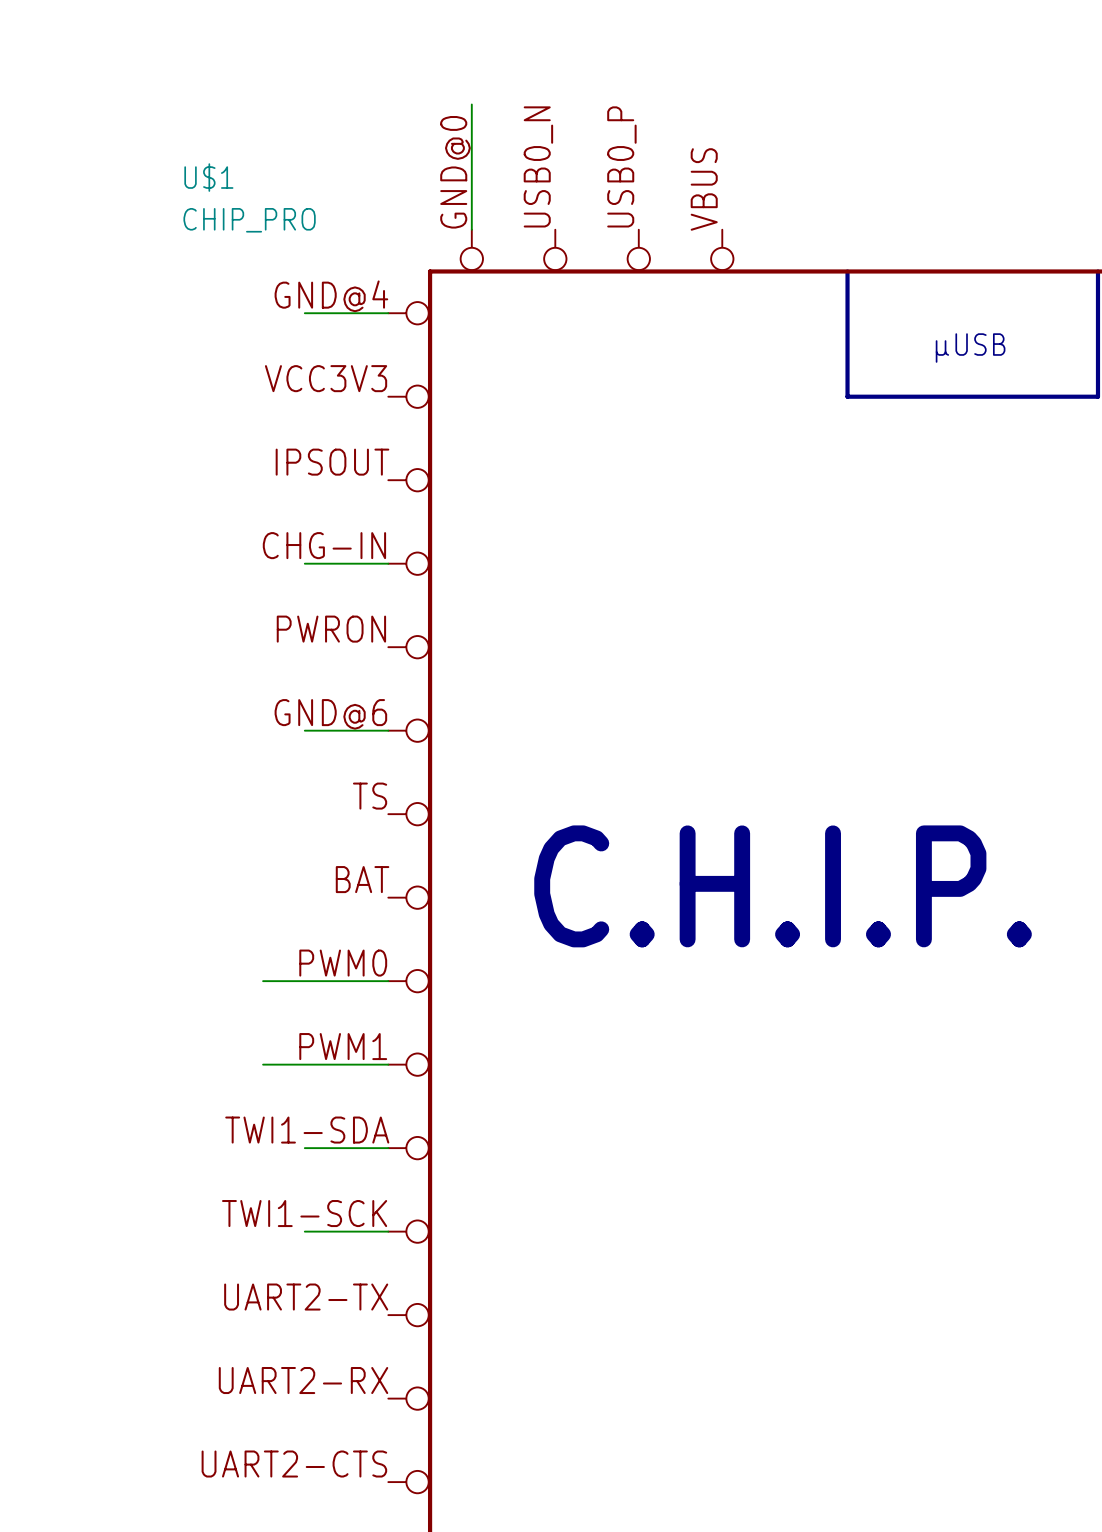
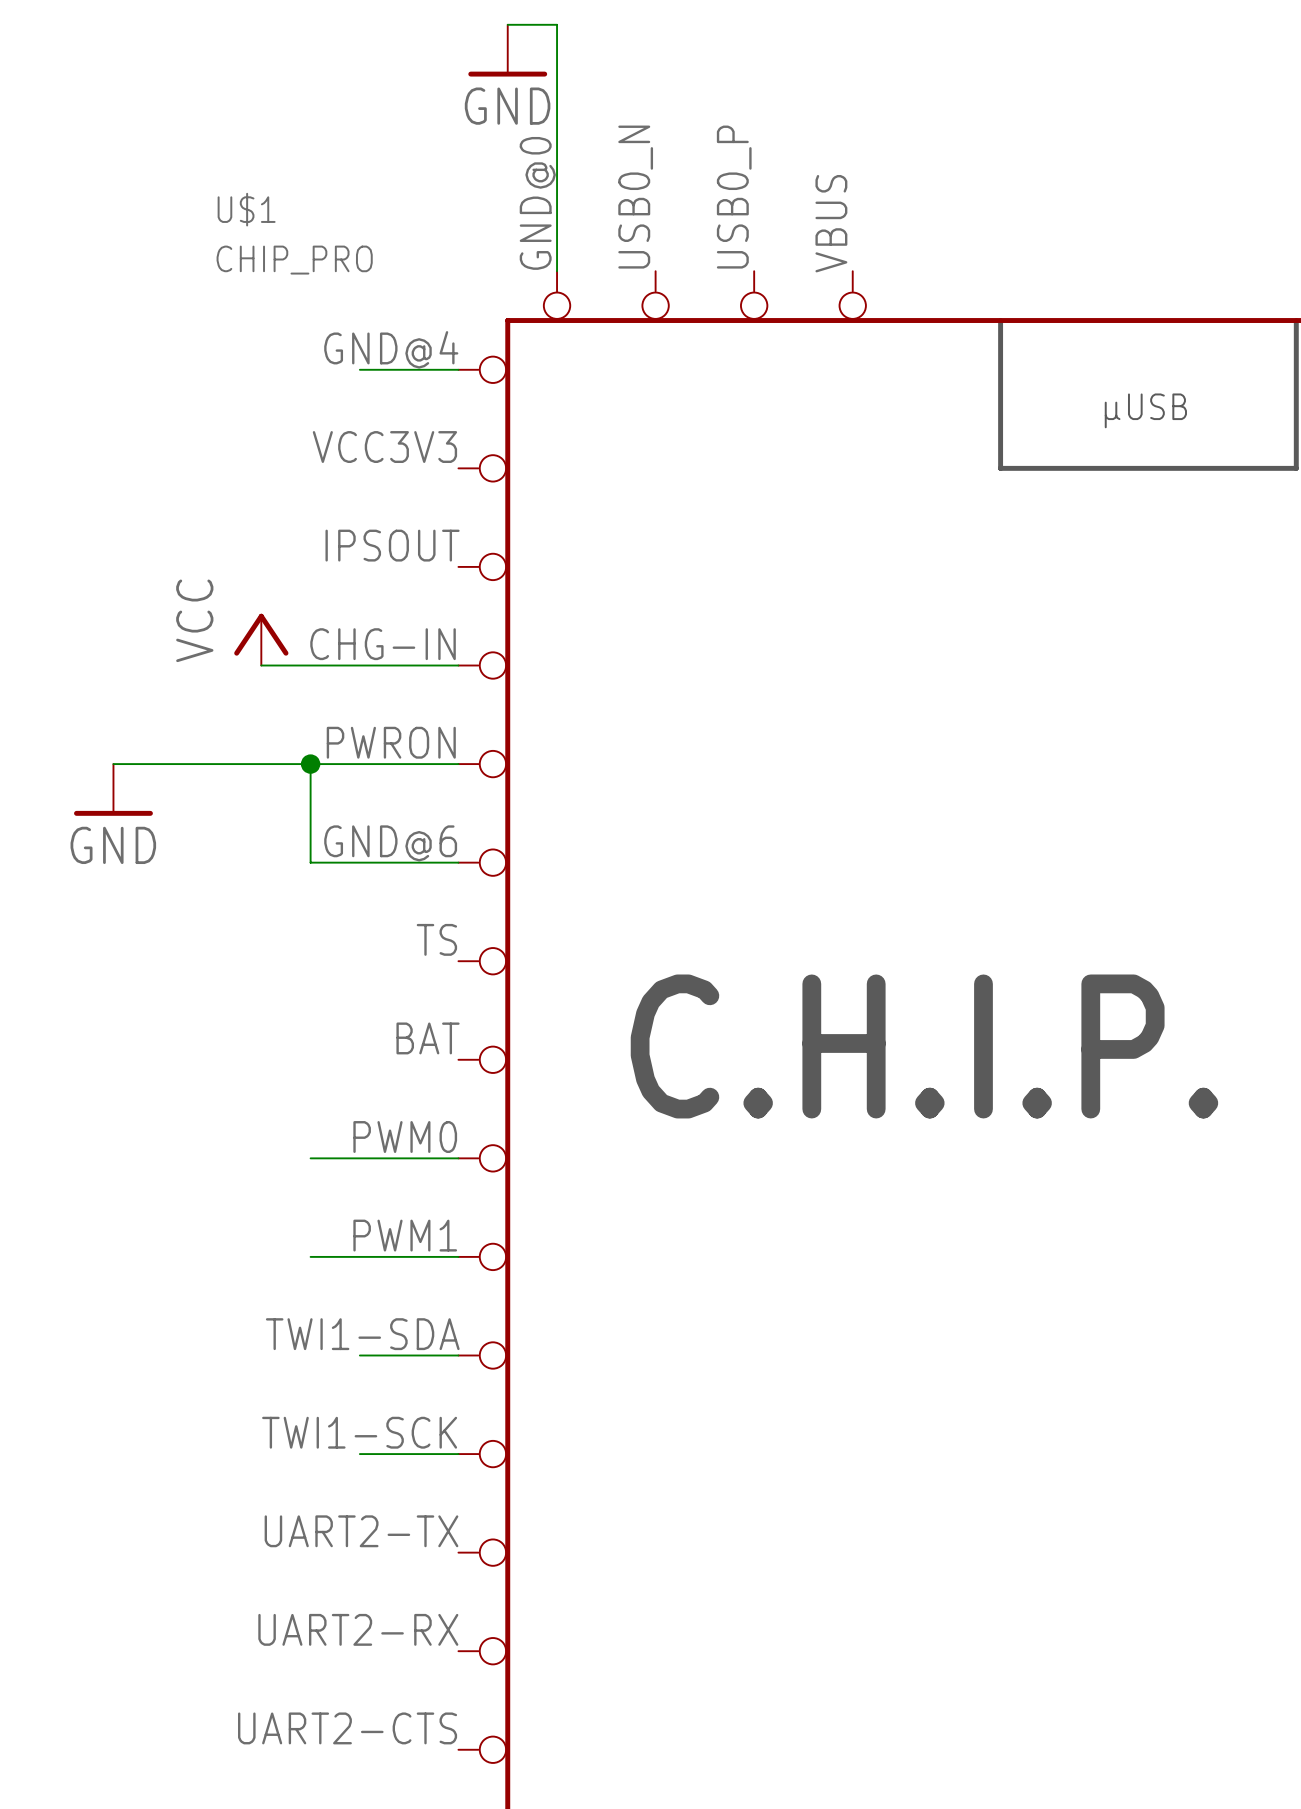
wire: none -> (507, 24) (557, 24) (557, 123)
power symbol: none -> GND (507, 50)
power symbol: none -> VCC (261, 639)
wire: none -> (261, 665) (359, 665)
wire: none -> (113, 764) (458, 764)
wire: none -> (310, 764) (310, 862) (359, 862)
junction: none -> (310, 764)
power symbol: none -> GND (113, 789)

